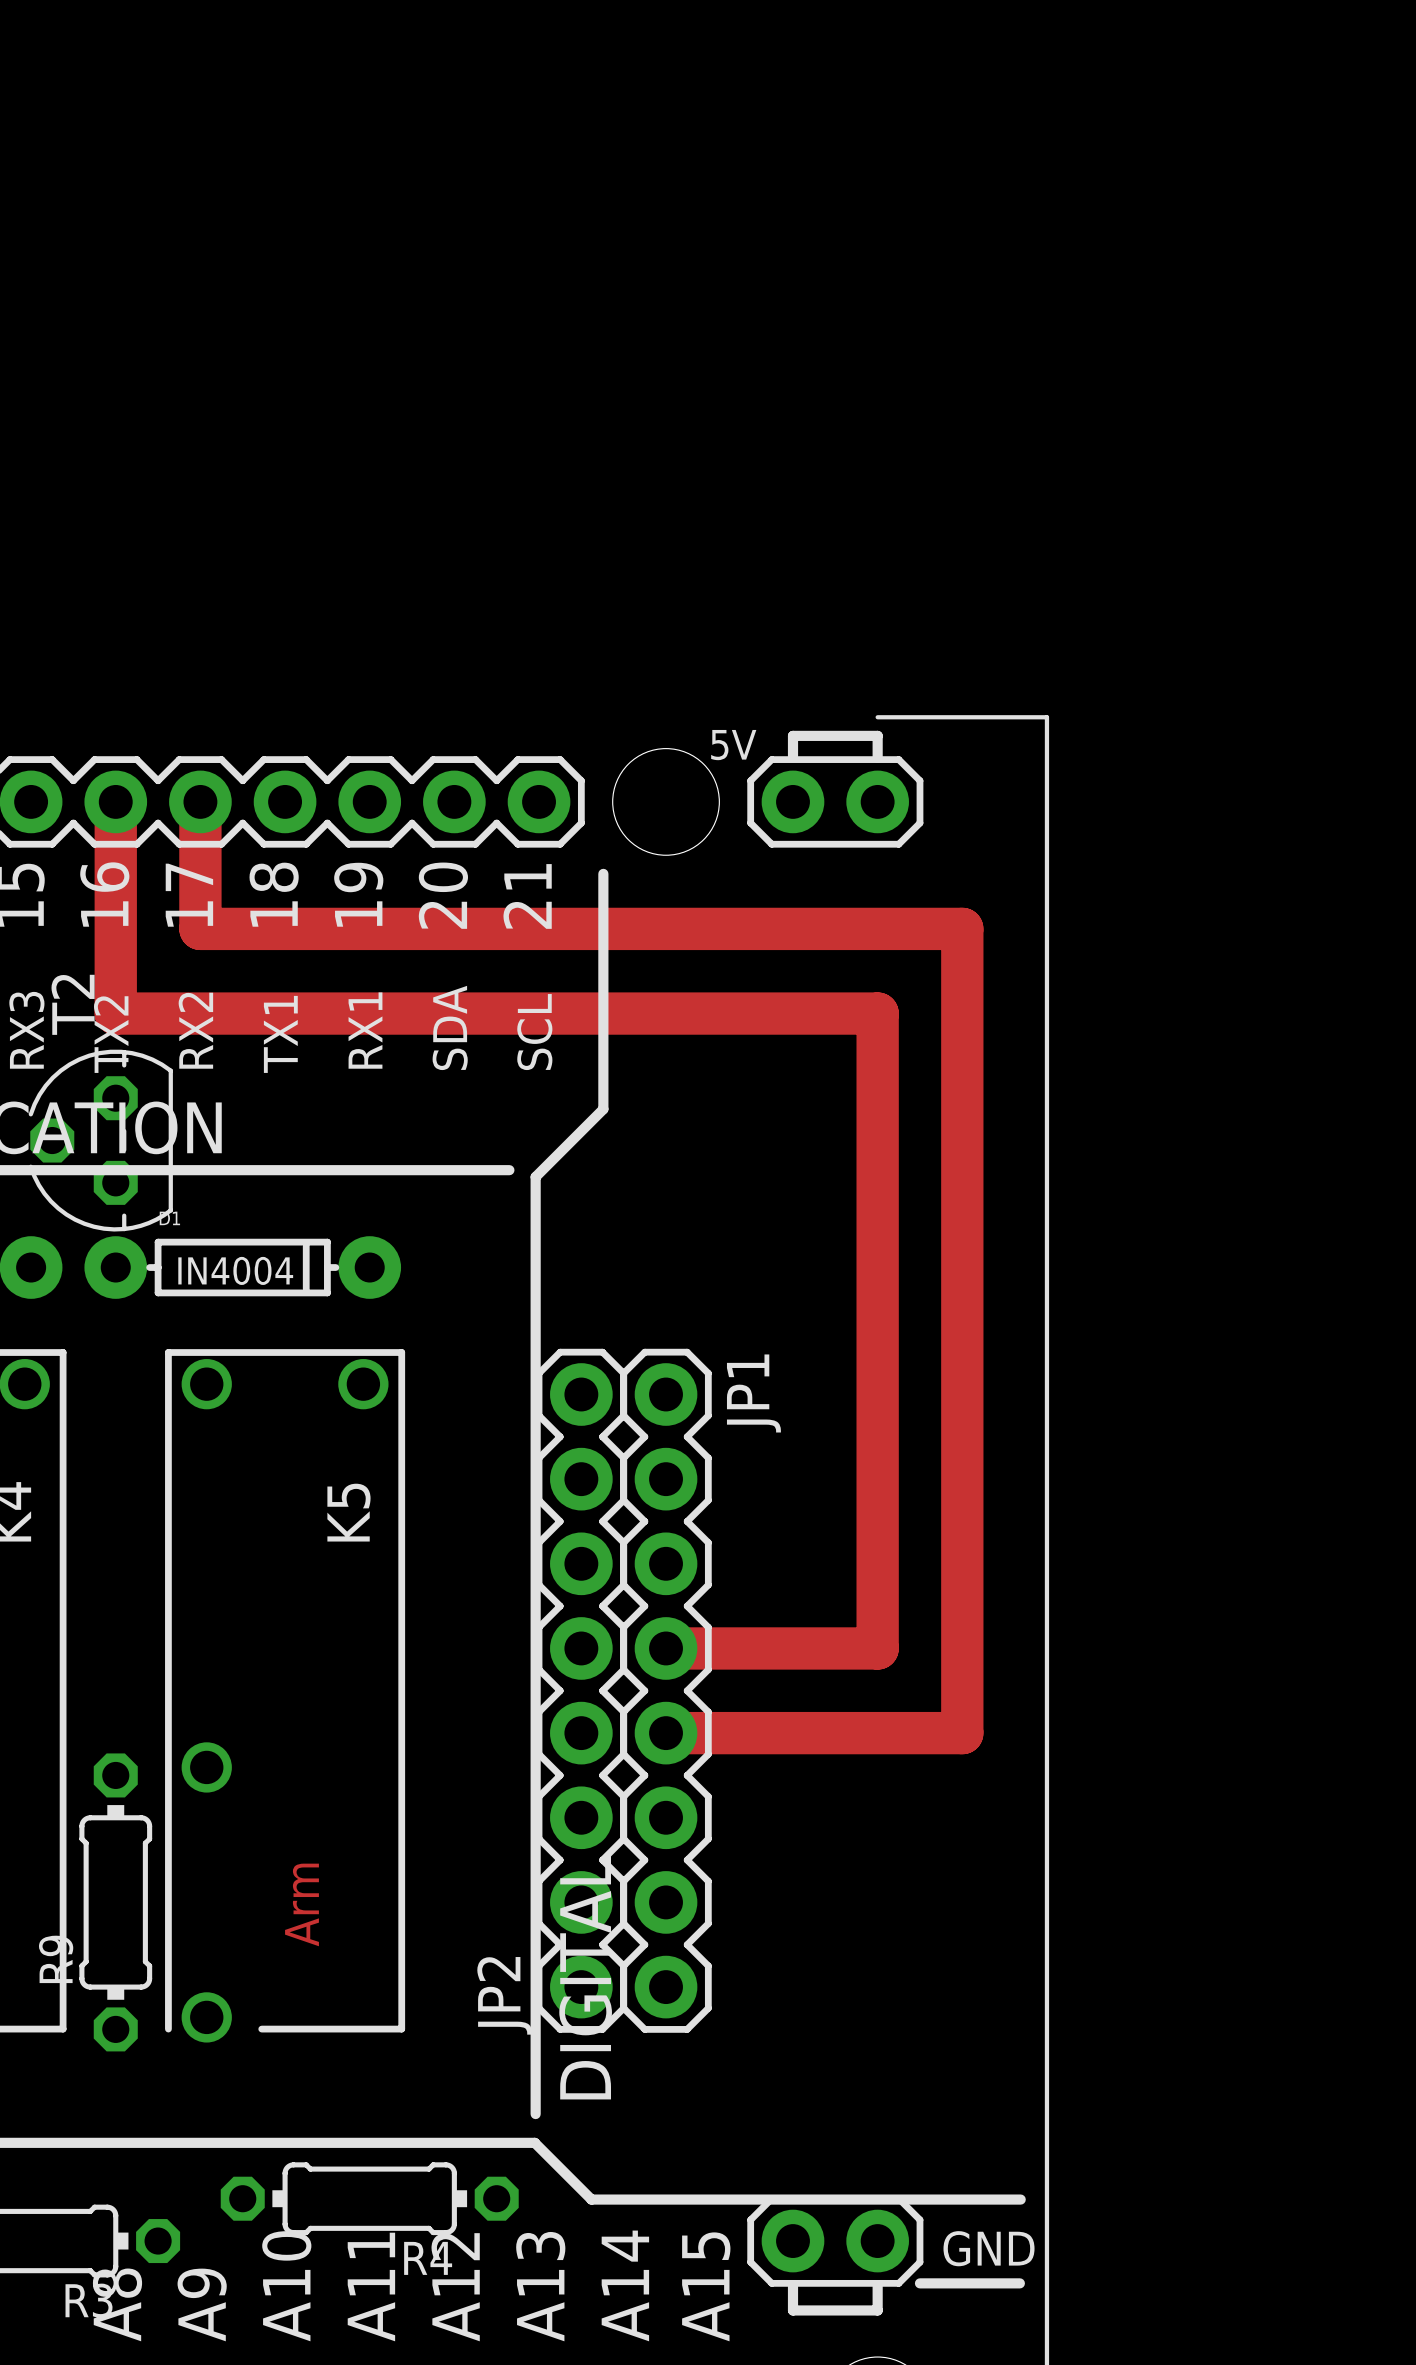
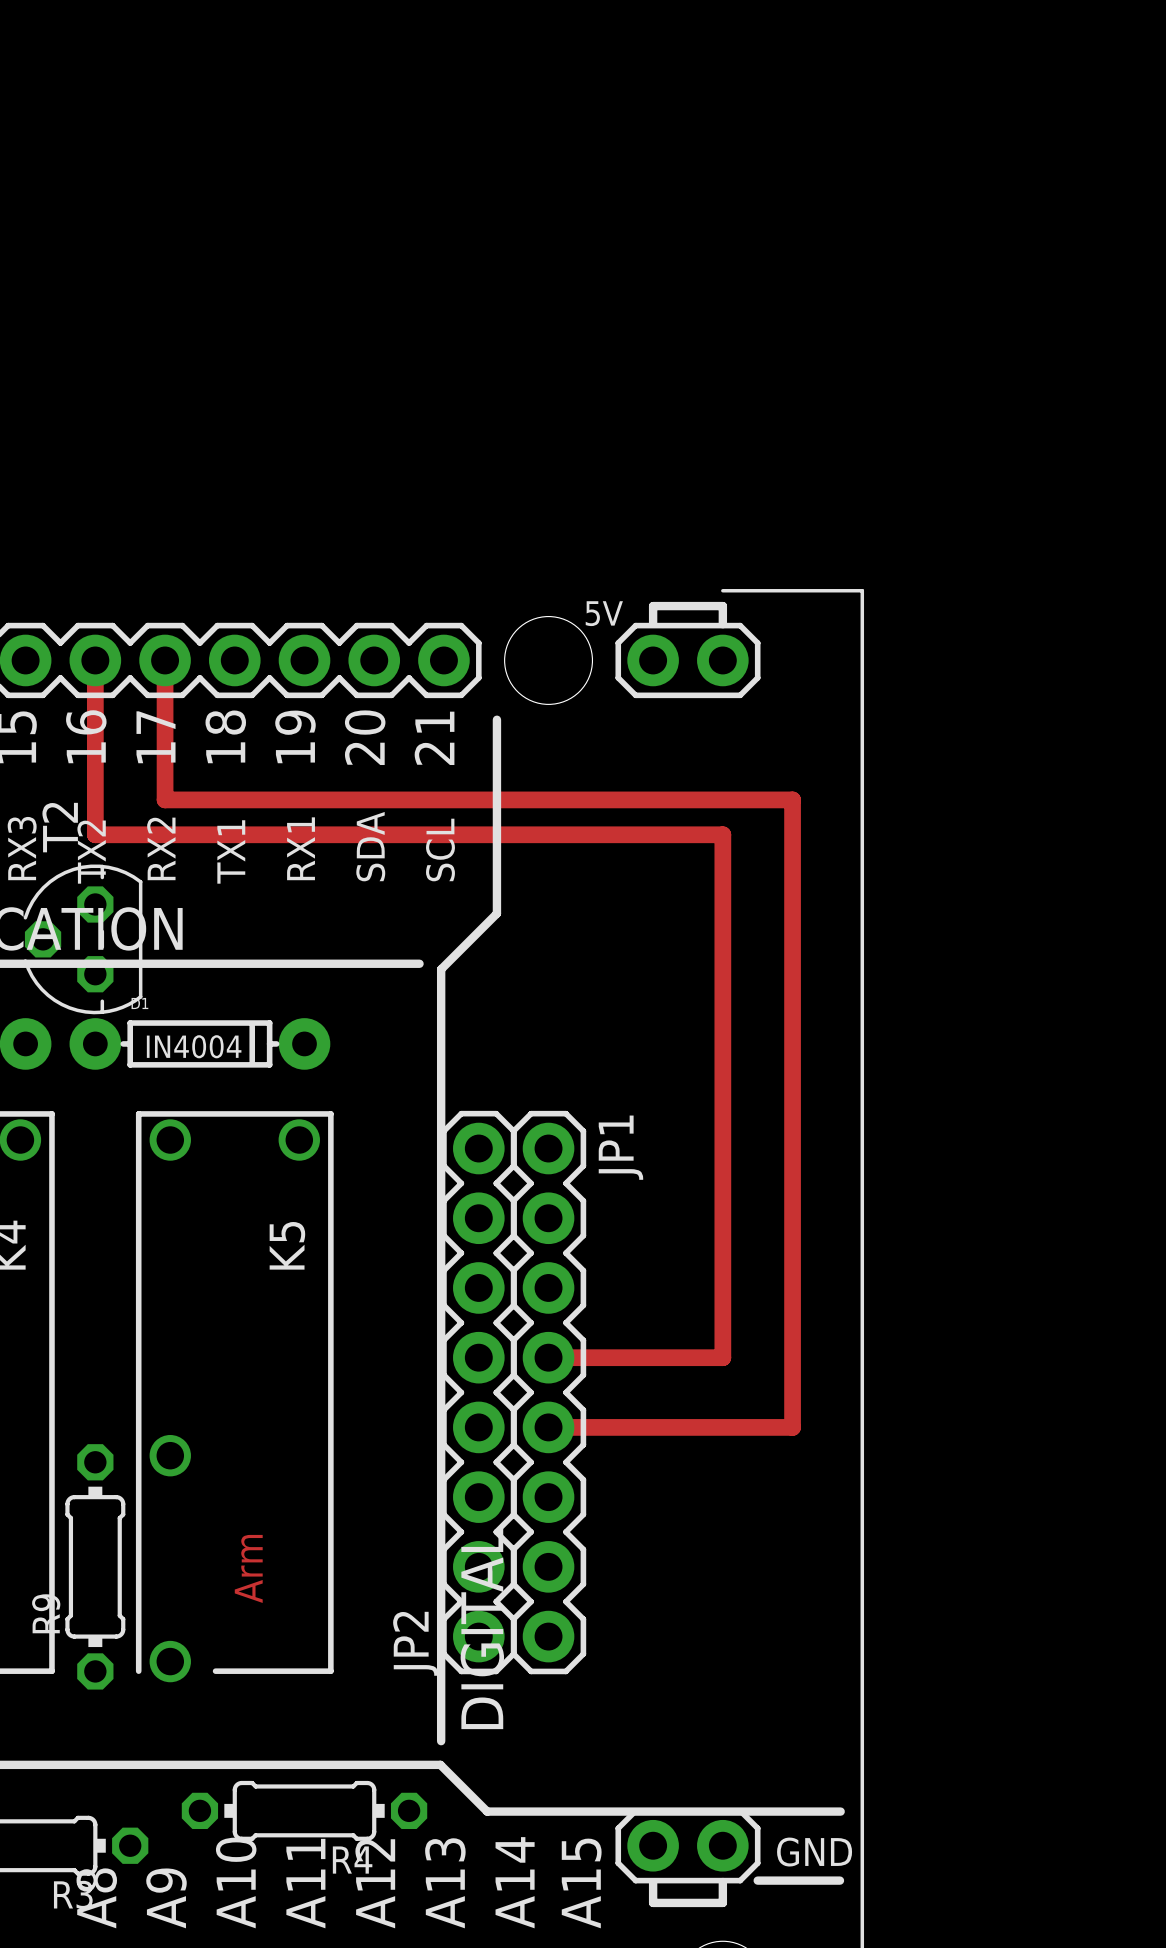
track width: thick (115, 801) (115, 1013) (877, 1013) (877, 1648) (666, 1648) -> thin (95, 660) (95, 834) (722, 834) (722, 1357) (548, 1357)
track width: thick (200, 801) (200, 928) -> thin (165, 660) (165, 765)
track: (200, 928) (962, 928) (962, 971) -> (165, 765) (165, 799) (792, 799)
track width: thick (962, 971) (962, 1733) (666, 1733) -> thin (792, 799) (792, 1427) (548, 1427)

